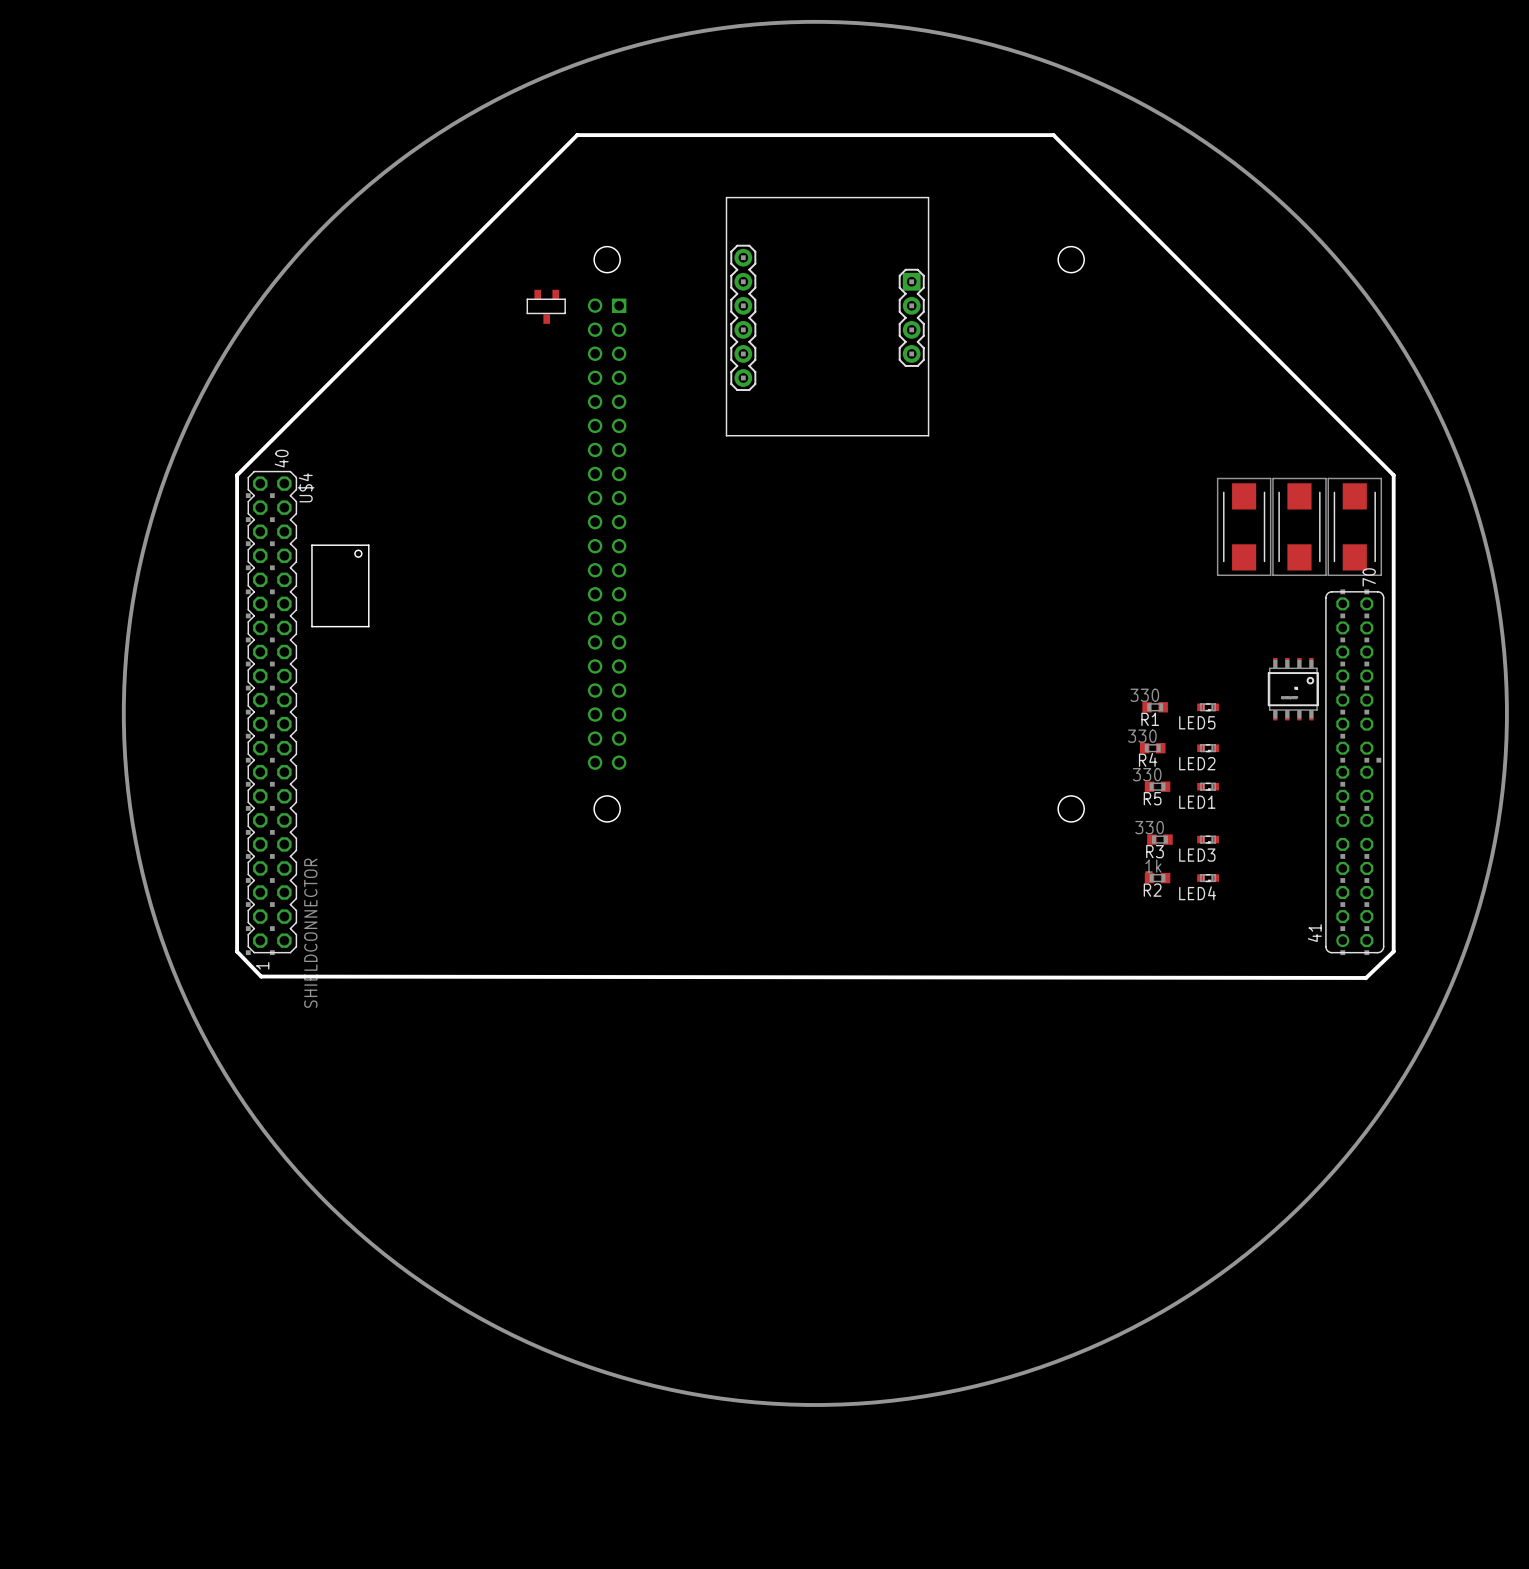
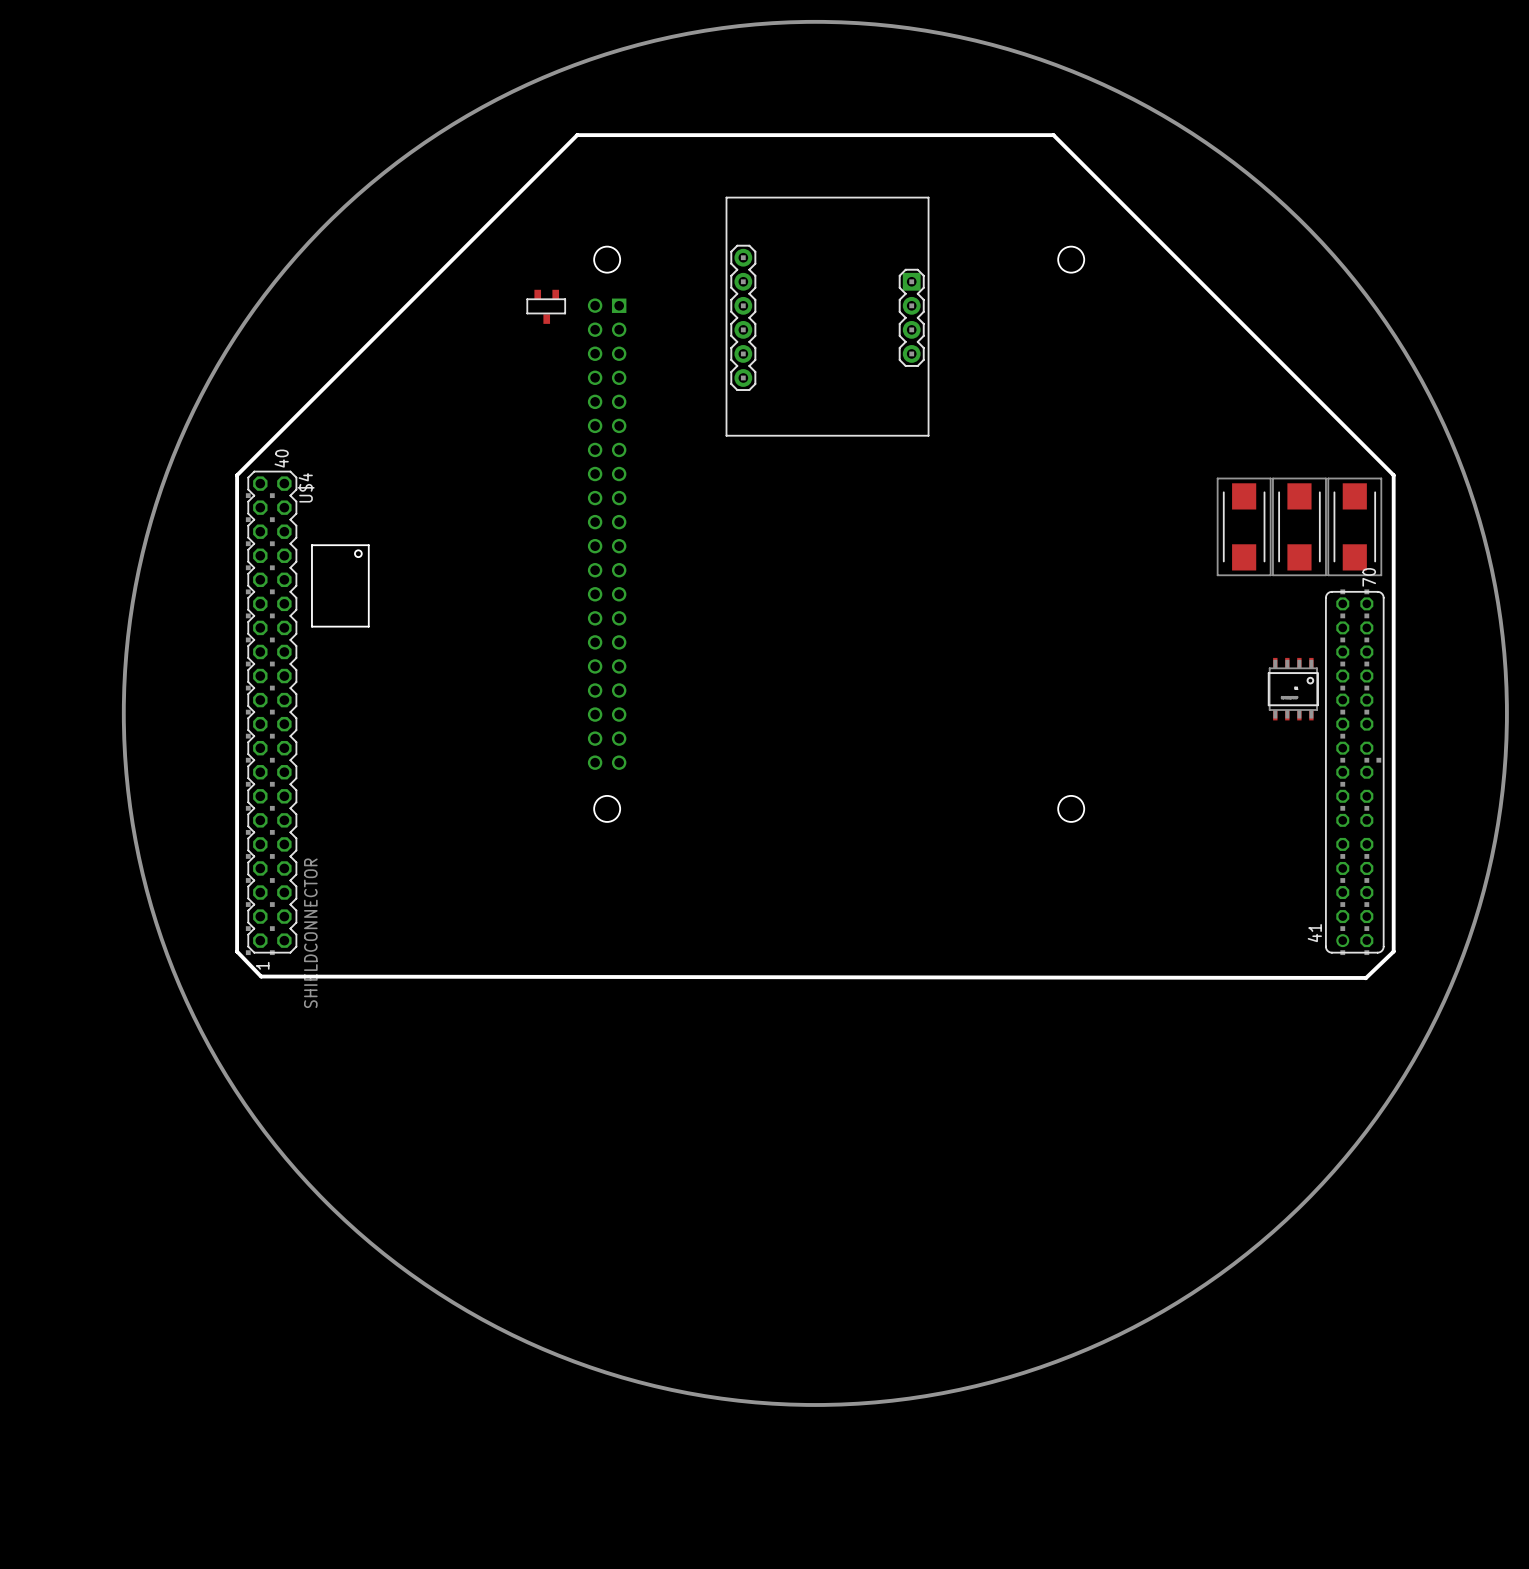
R1: 330 (1155, 707) -> none
LED5: (1208, 707) -> none
R4: 330 (1152, 748) -> none
LED2: (1208, 748) -> none
R5: 330 (1157, 786) -> none
LED1: (1208, 786) -> none
R3: 330 (1159, 839) -> none
LED3: (1208, 839) -> none
R2: 1k (1157, 878) -> none
LED4: (1208, 878) -> none

